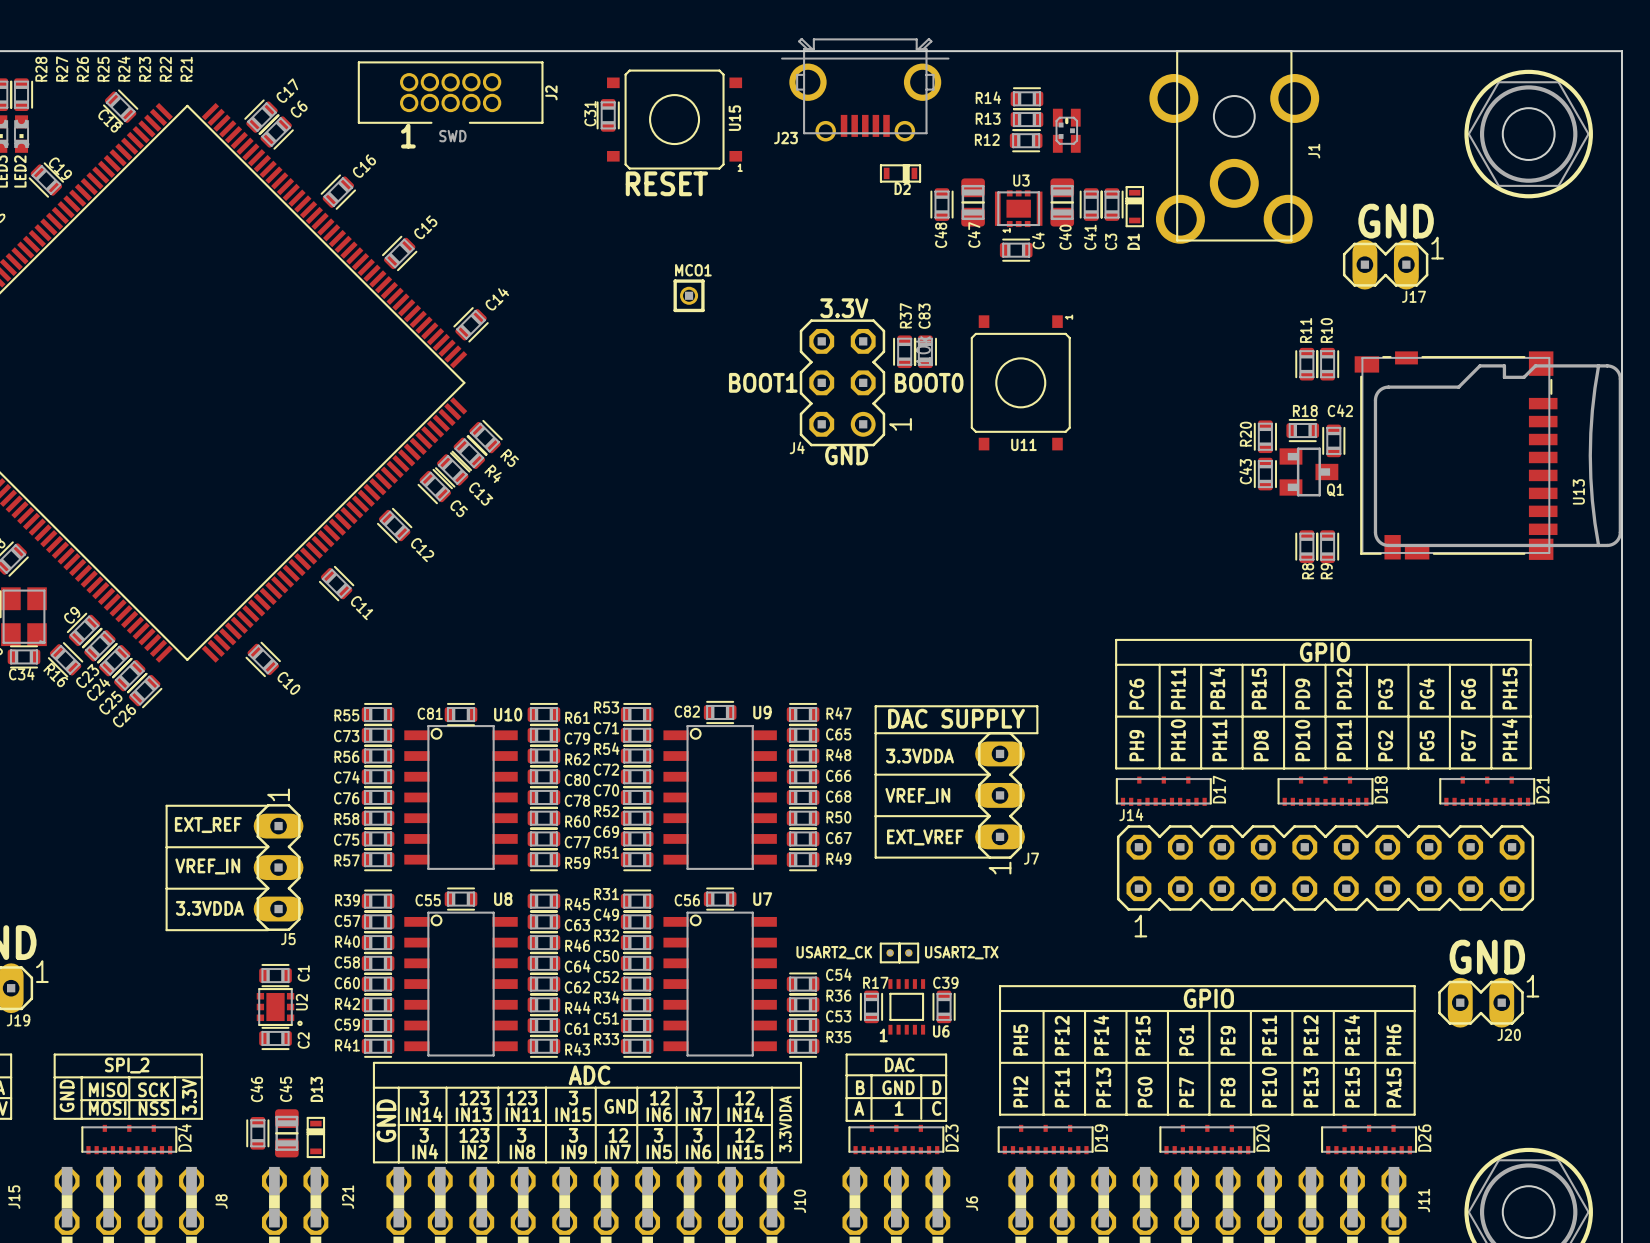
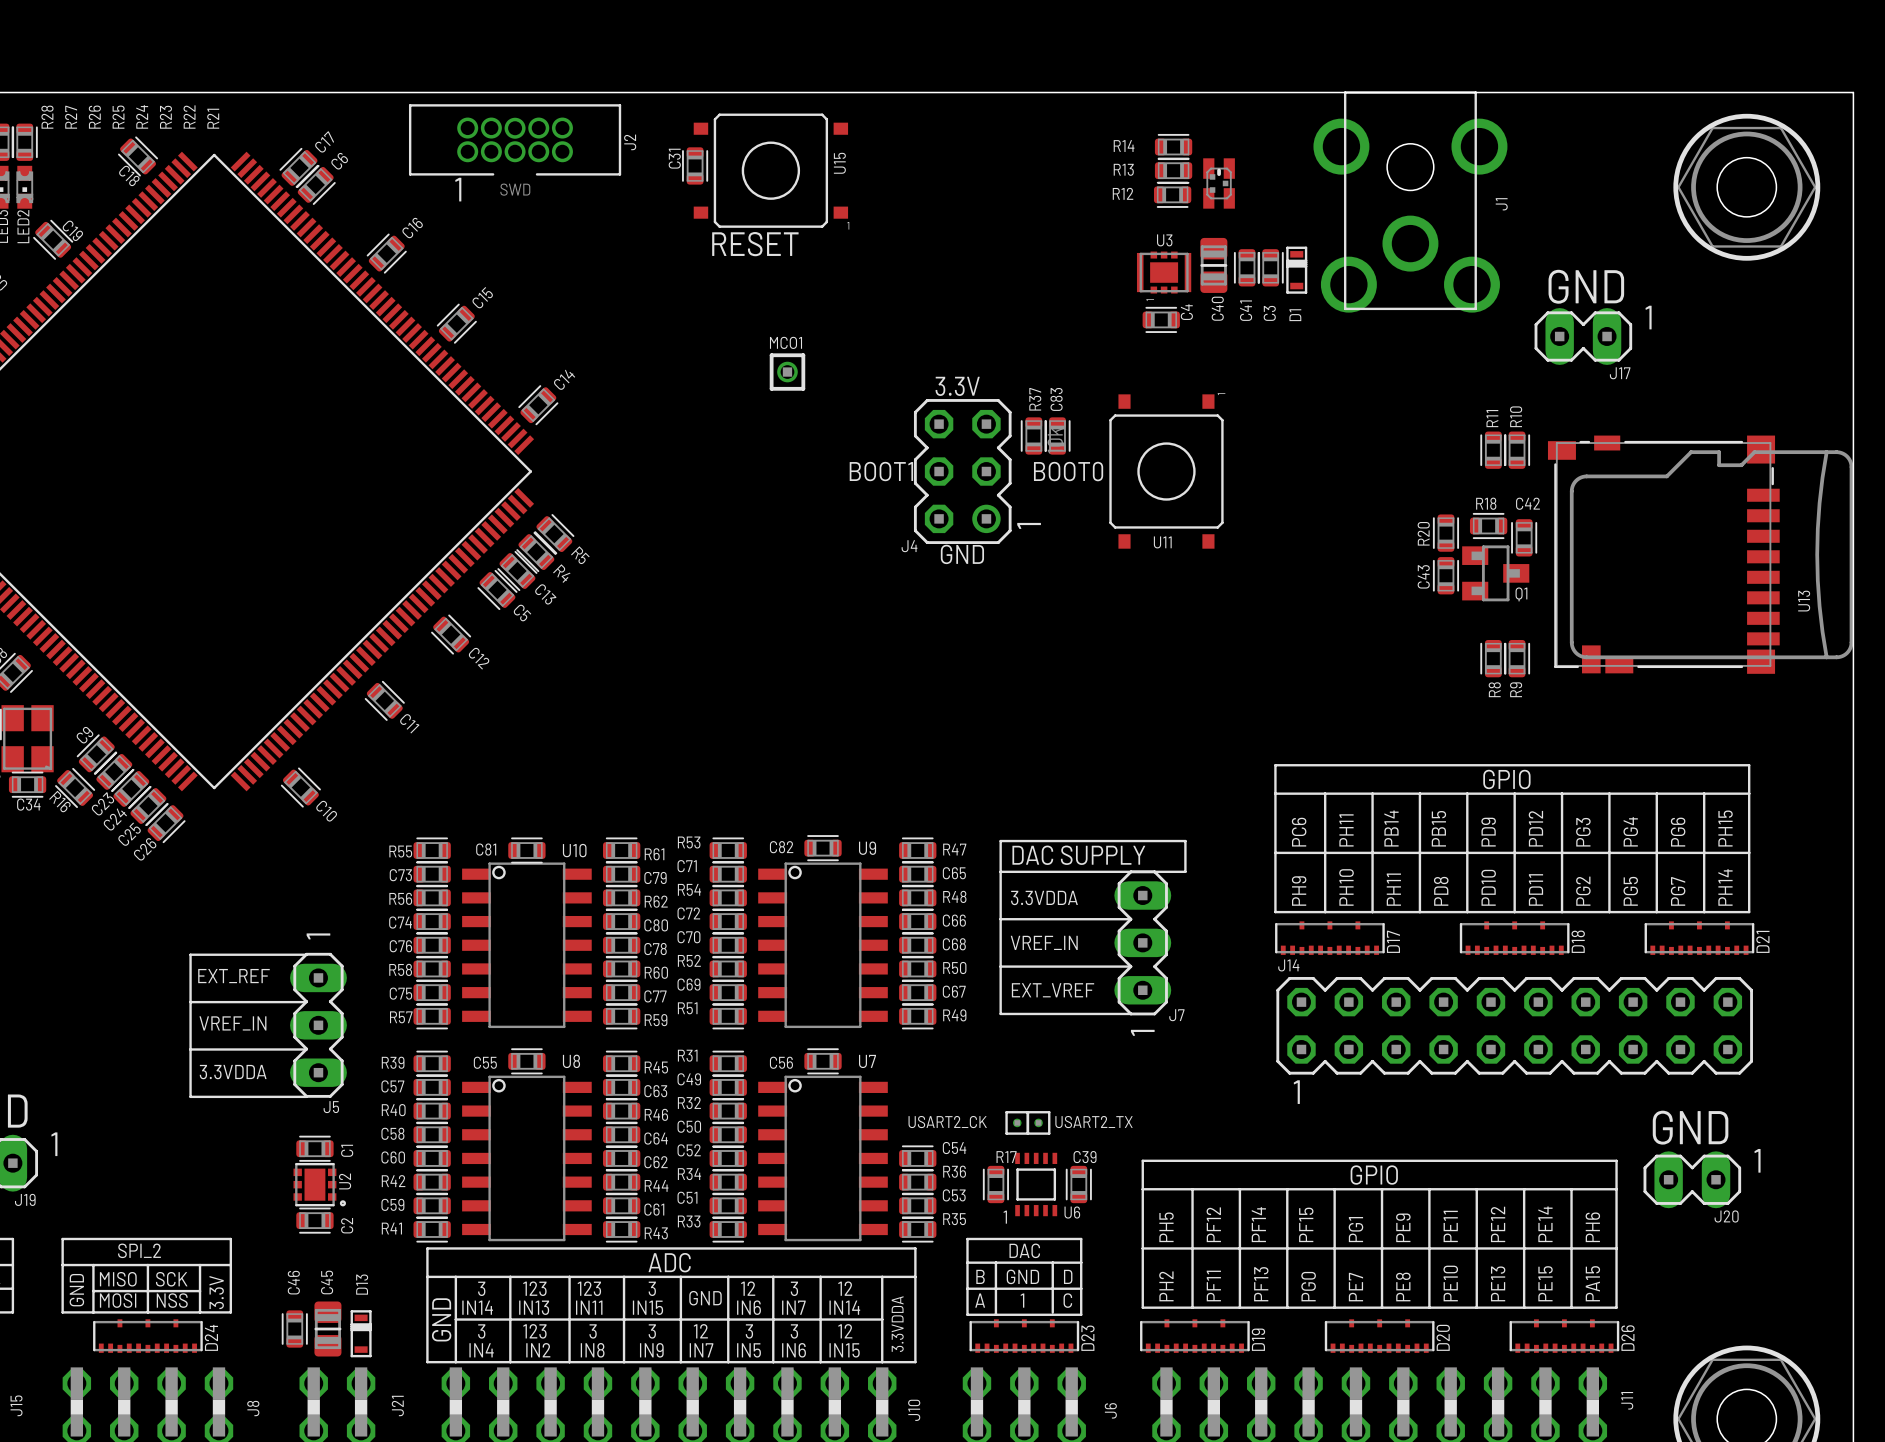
J23: (865, 89) -> none
D2: (900, 173) -> none
C47: (973, 202) -> none
C48: (941, 204) -> none

